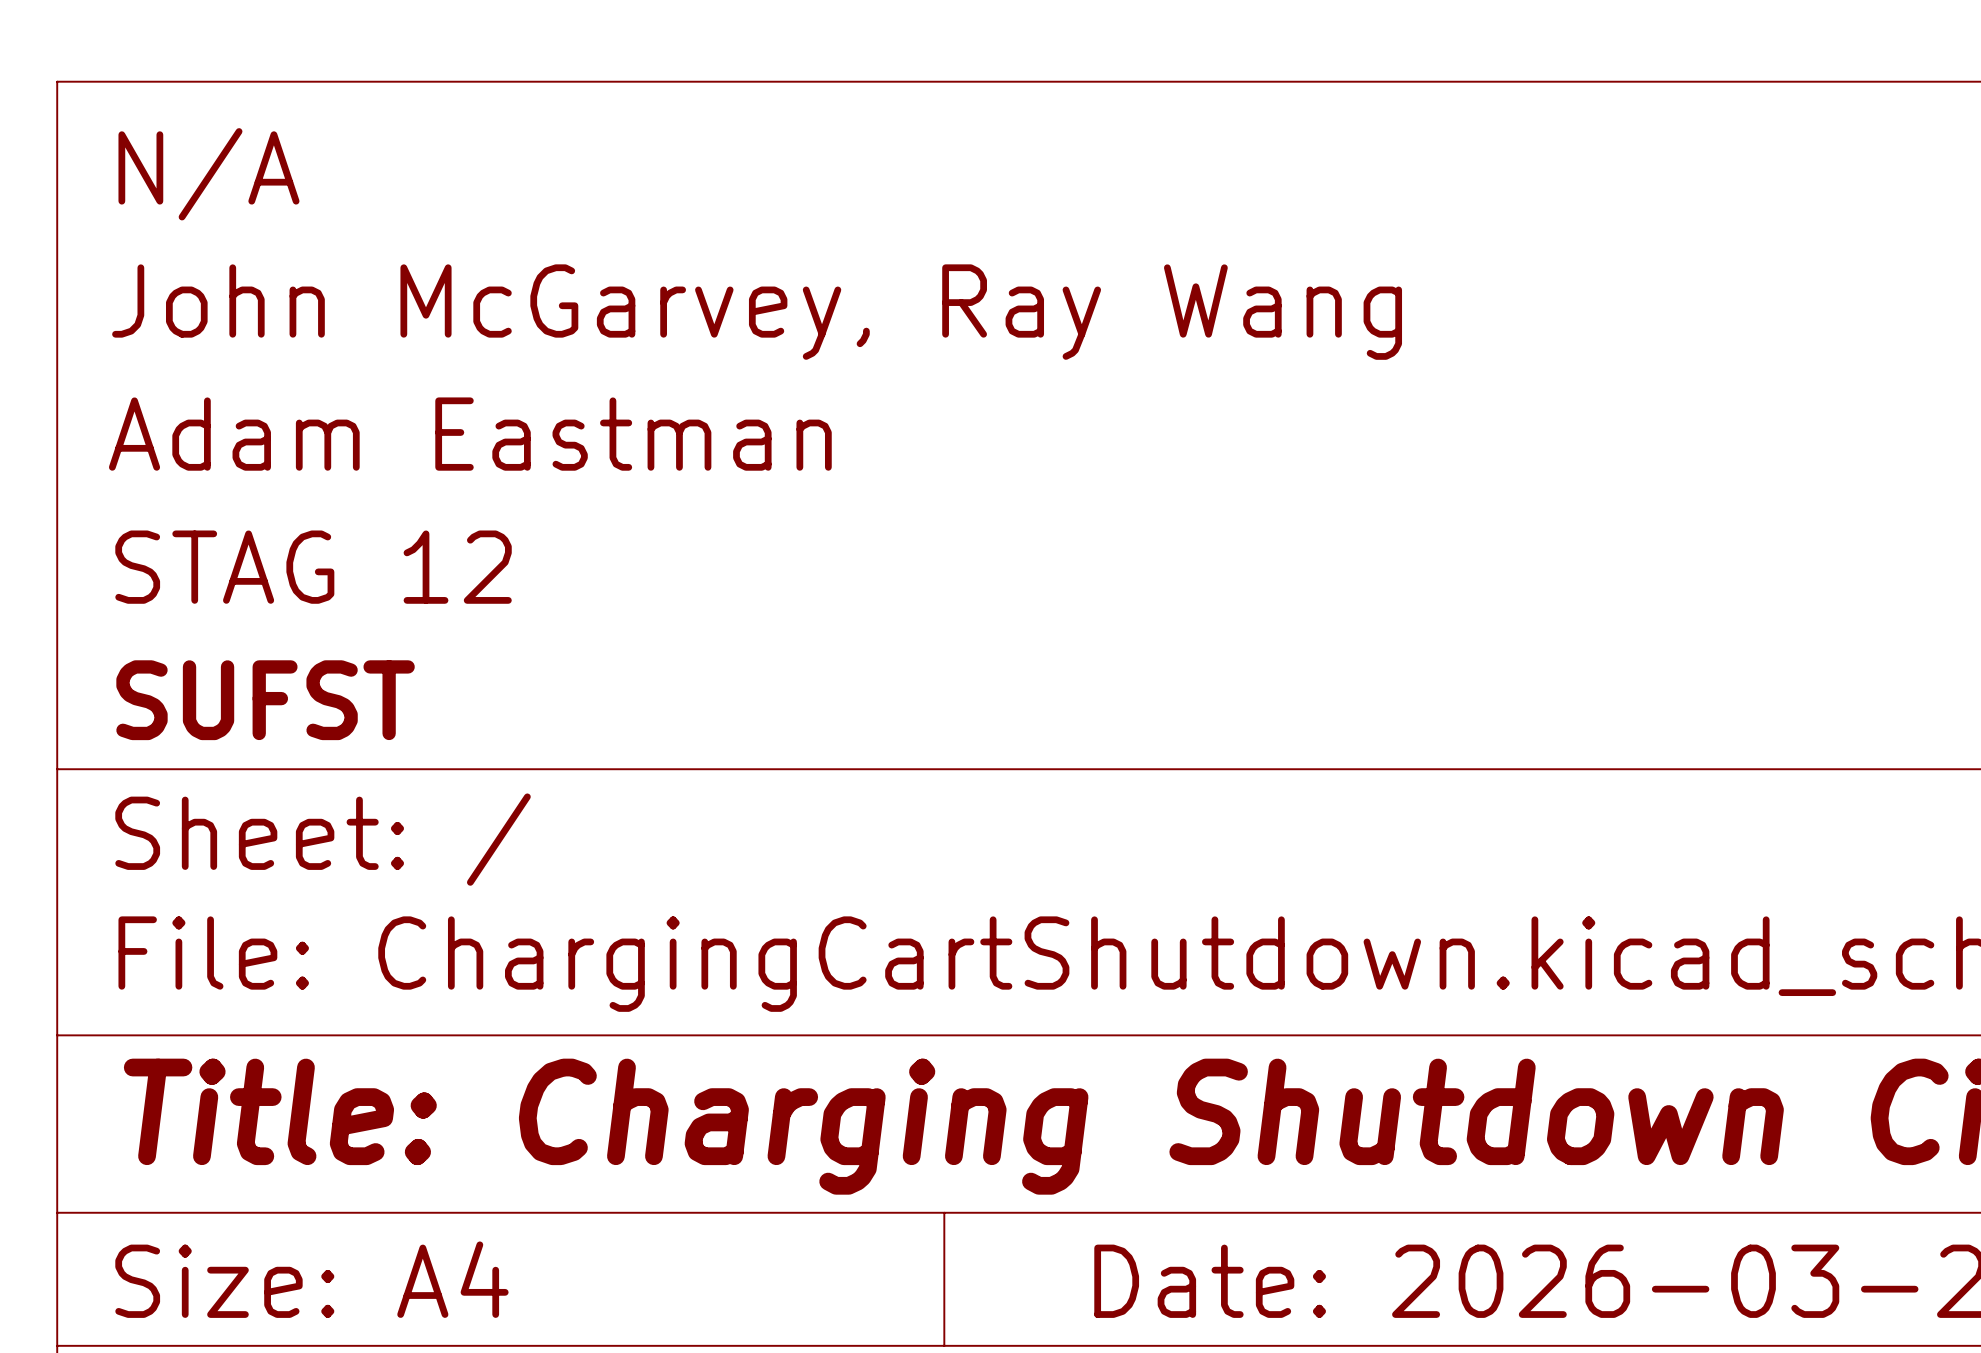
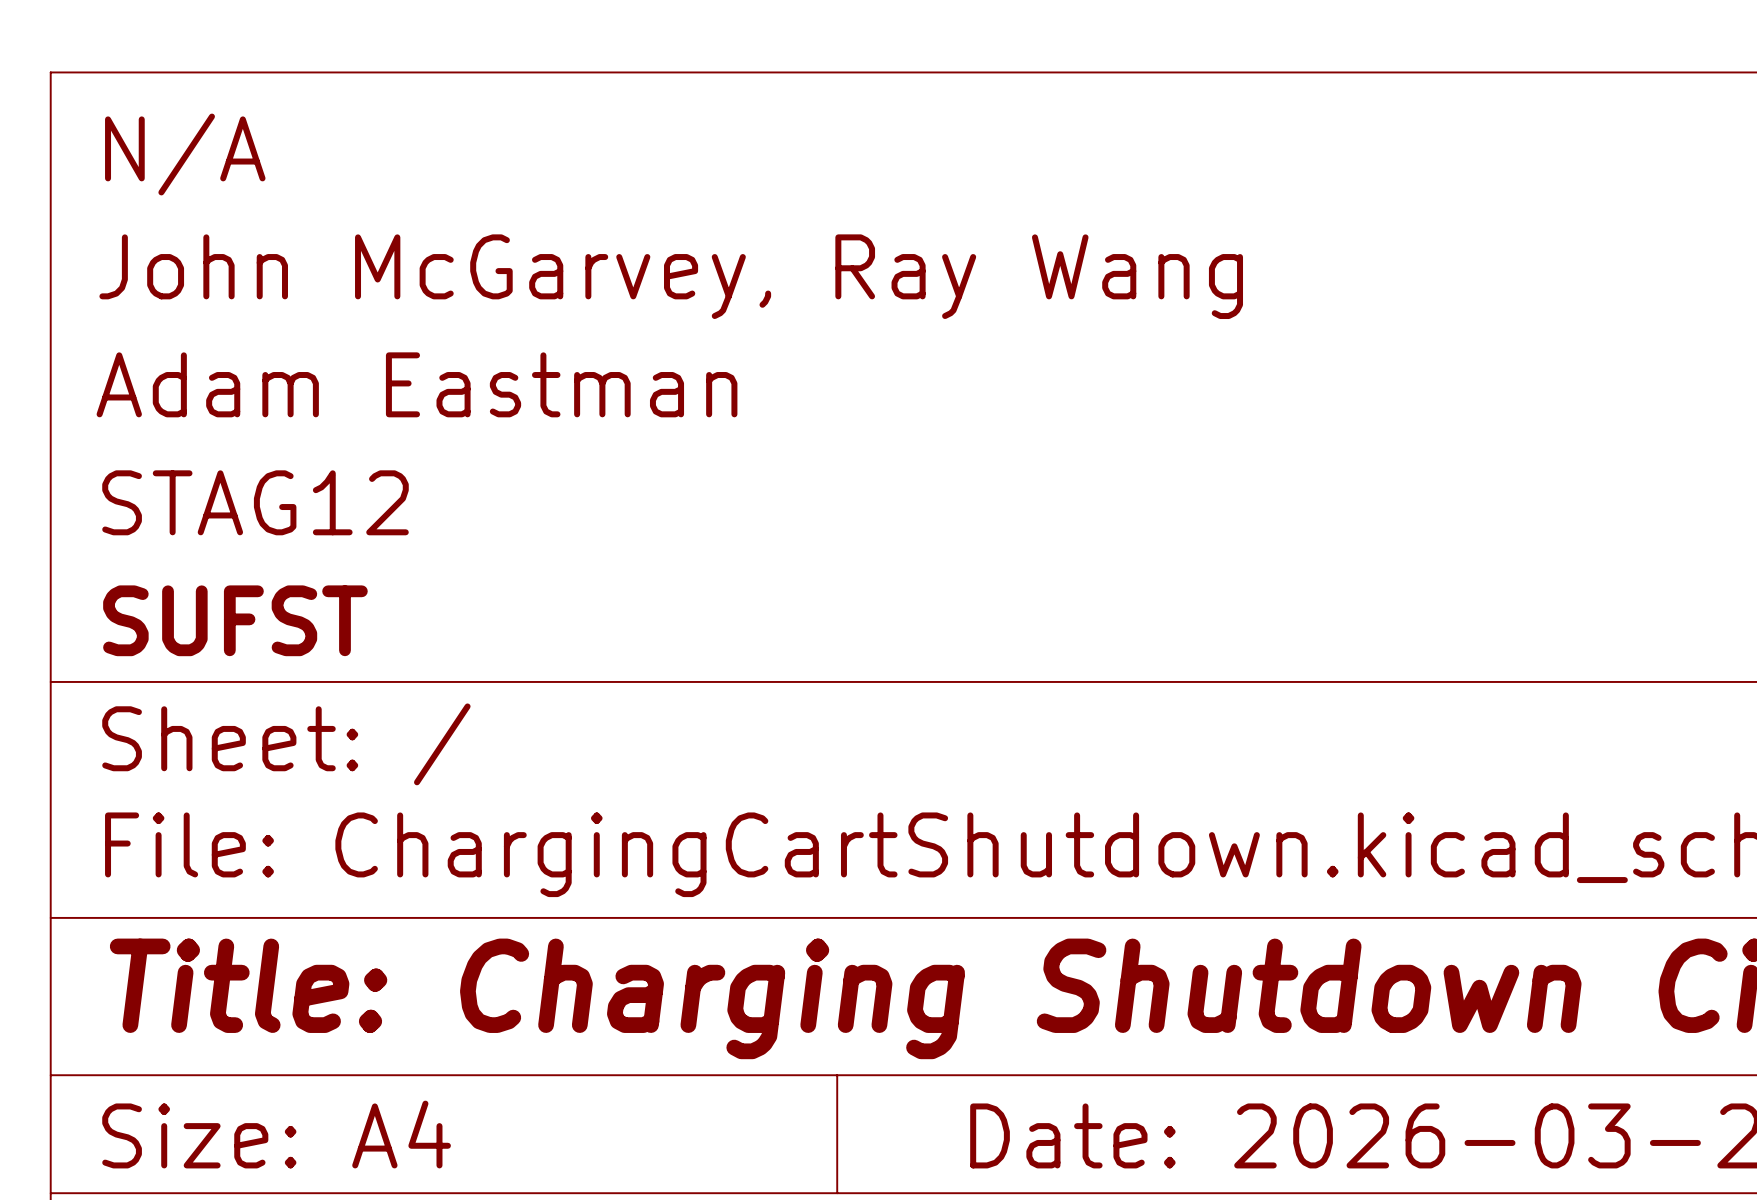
title block: STAG 12 (313, 567) -> STAG12 (255, 502)

